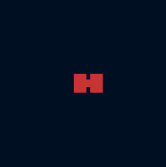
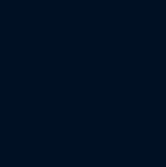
part: (88, 83) -> none

